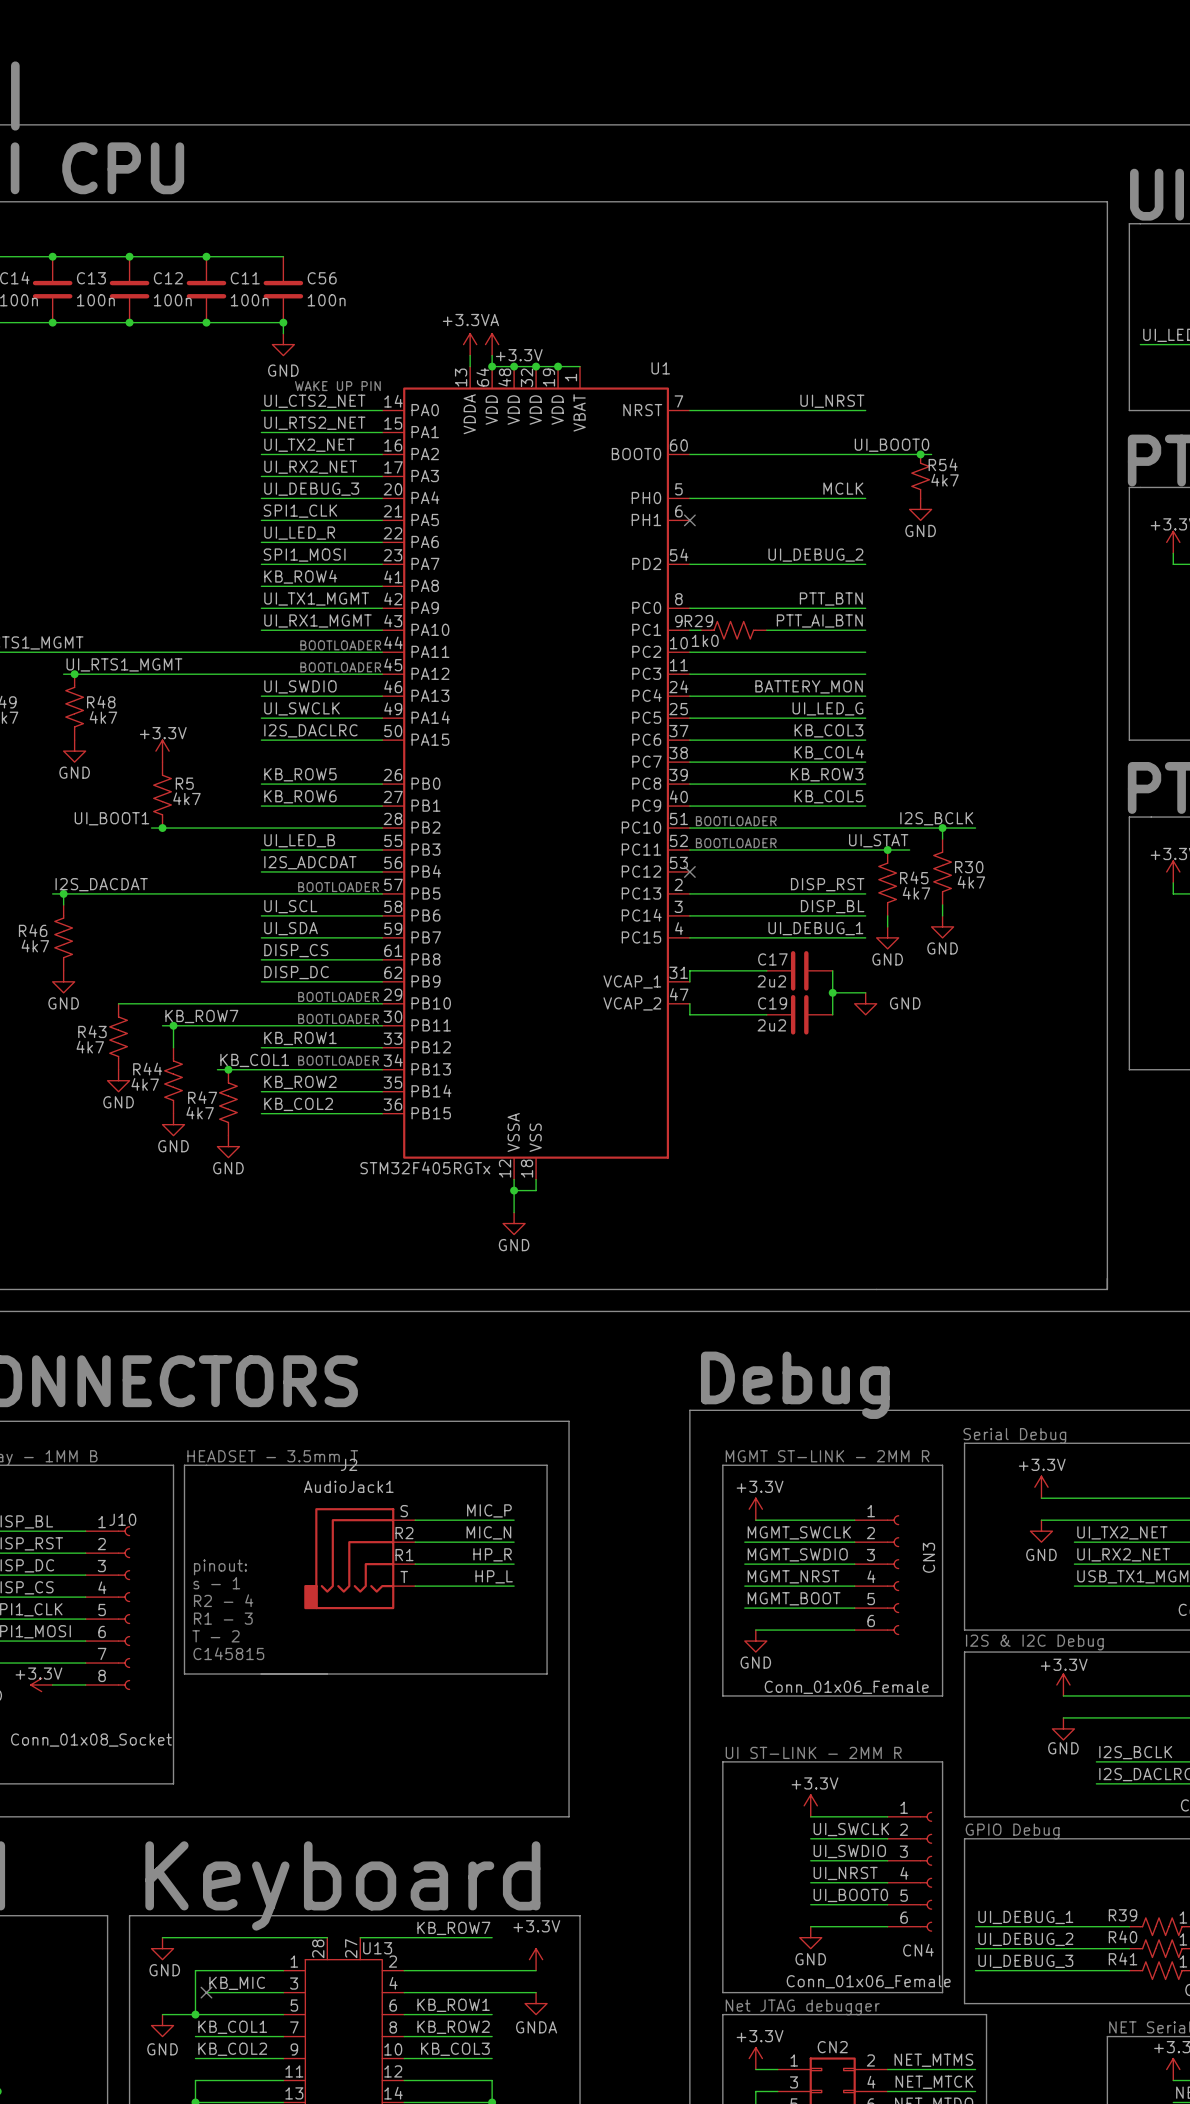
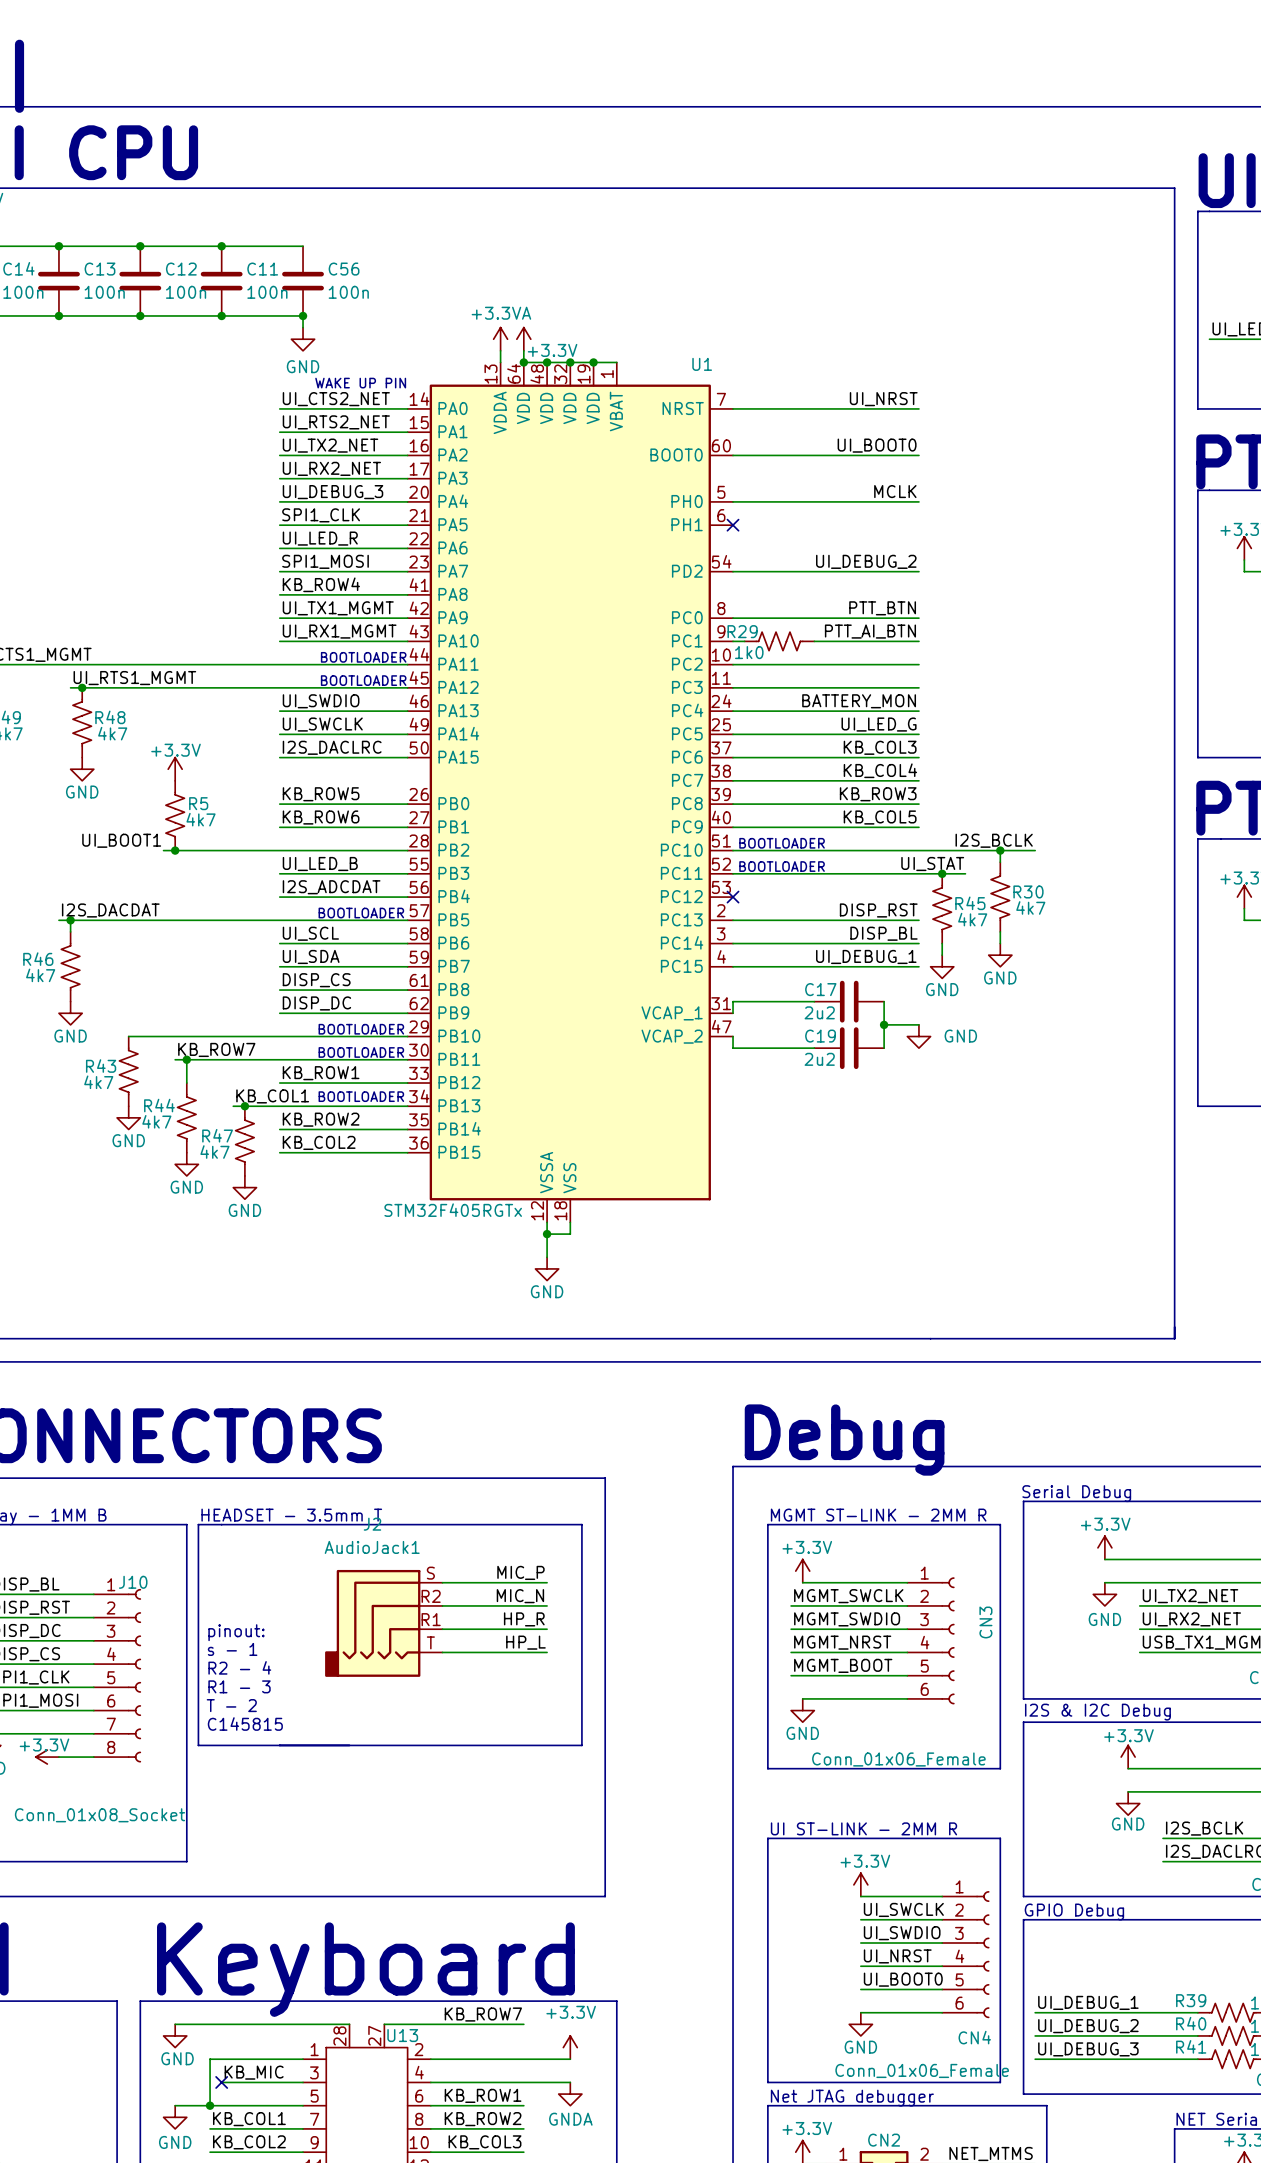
label position: UI_BOOT0 (892, 445) -> UI_BOOT0 (877, 445)
wire: (865, 454) (931, 454) -> none
junction: (920, 454) -> none
R54: 4k7 (920, 476) -> none
power symbol: GND (920, 509) -> none

